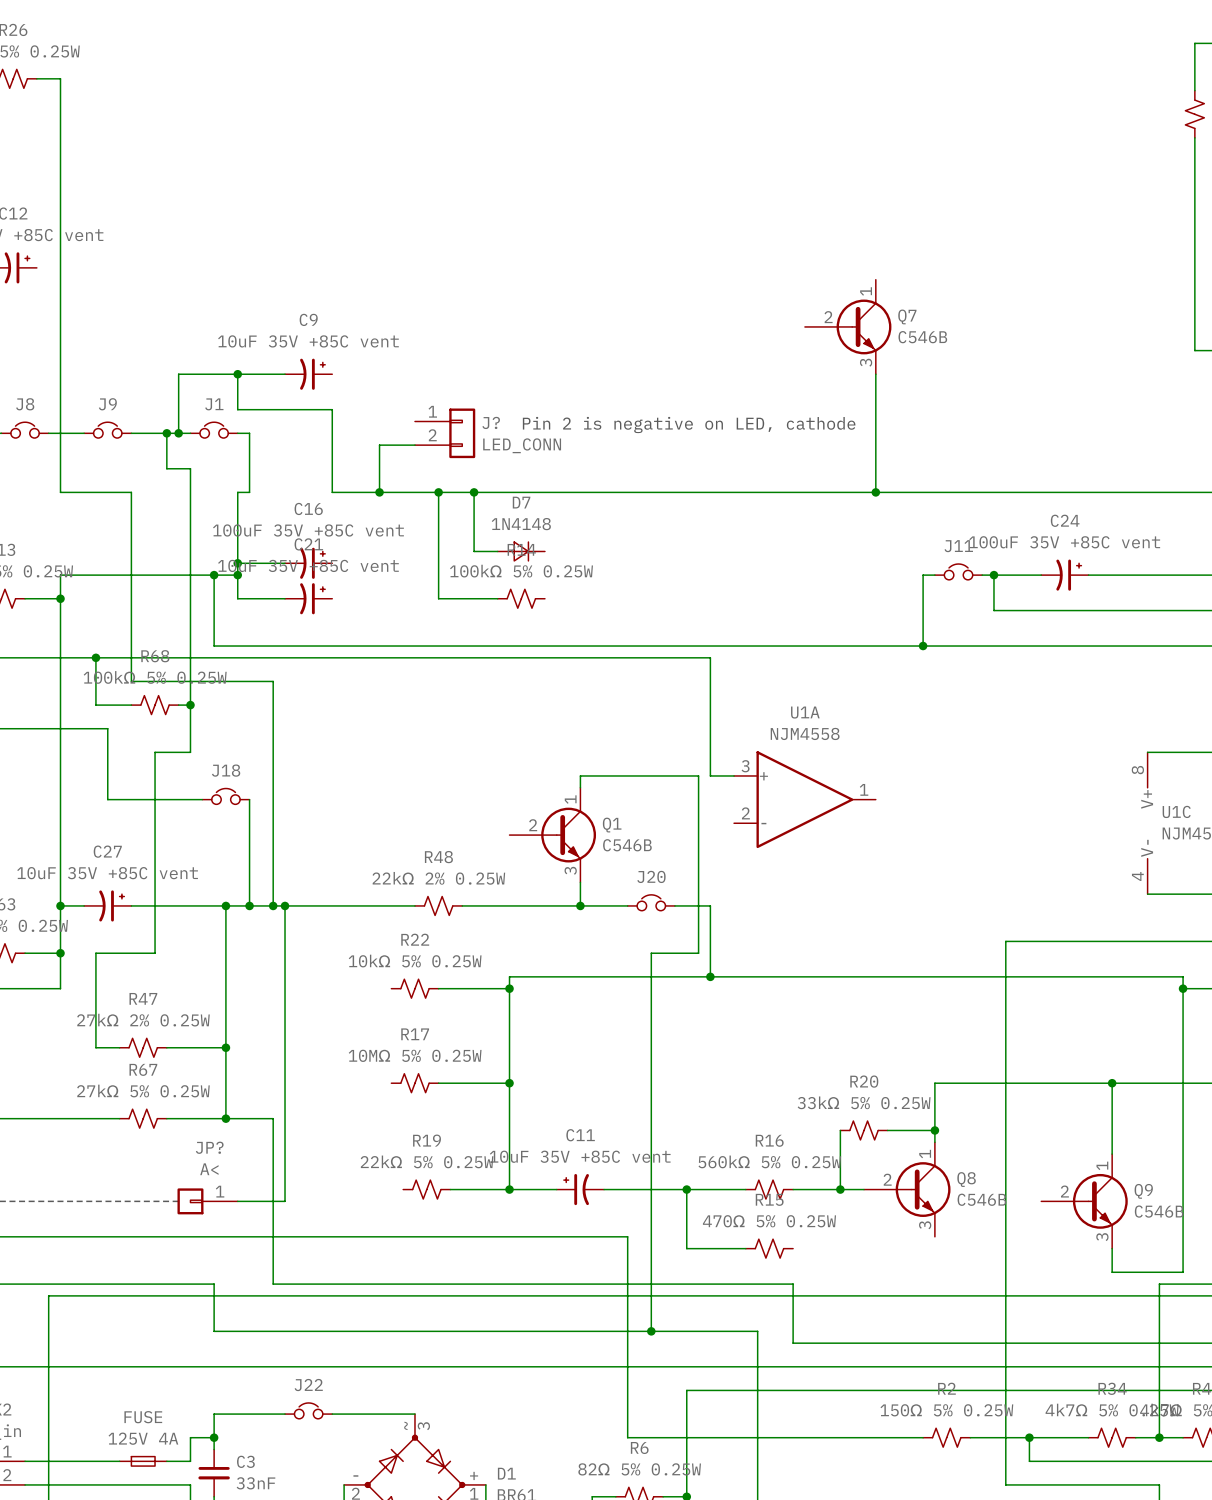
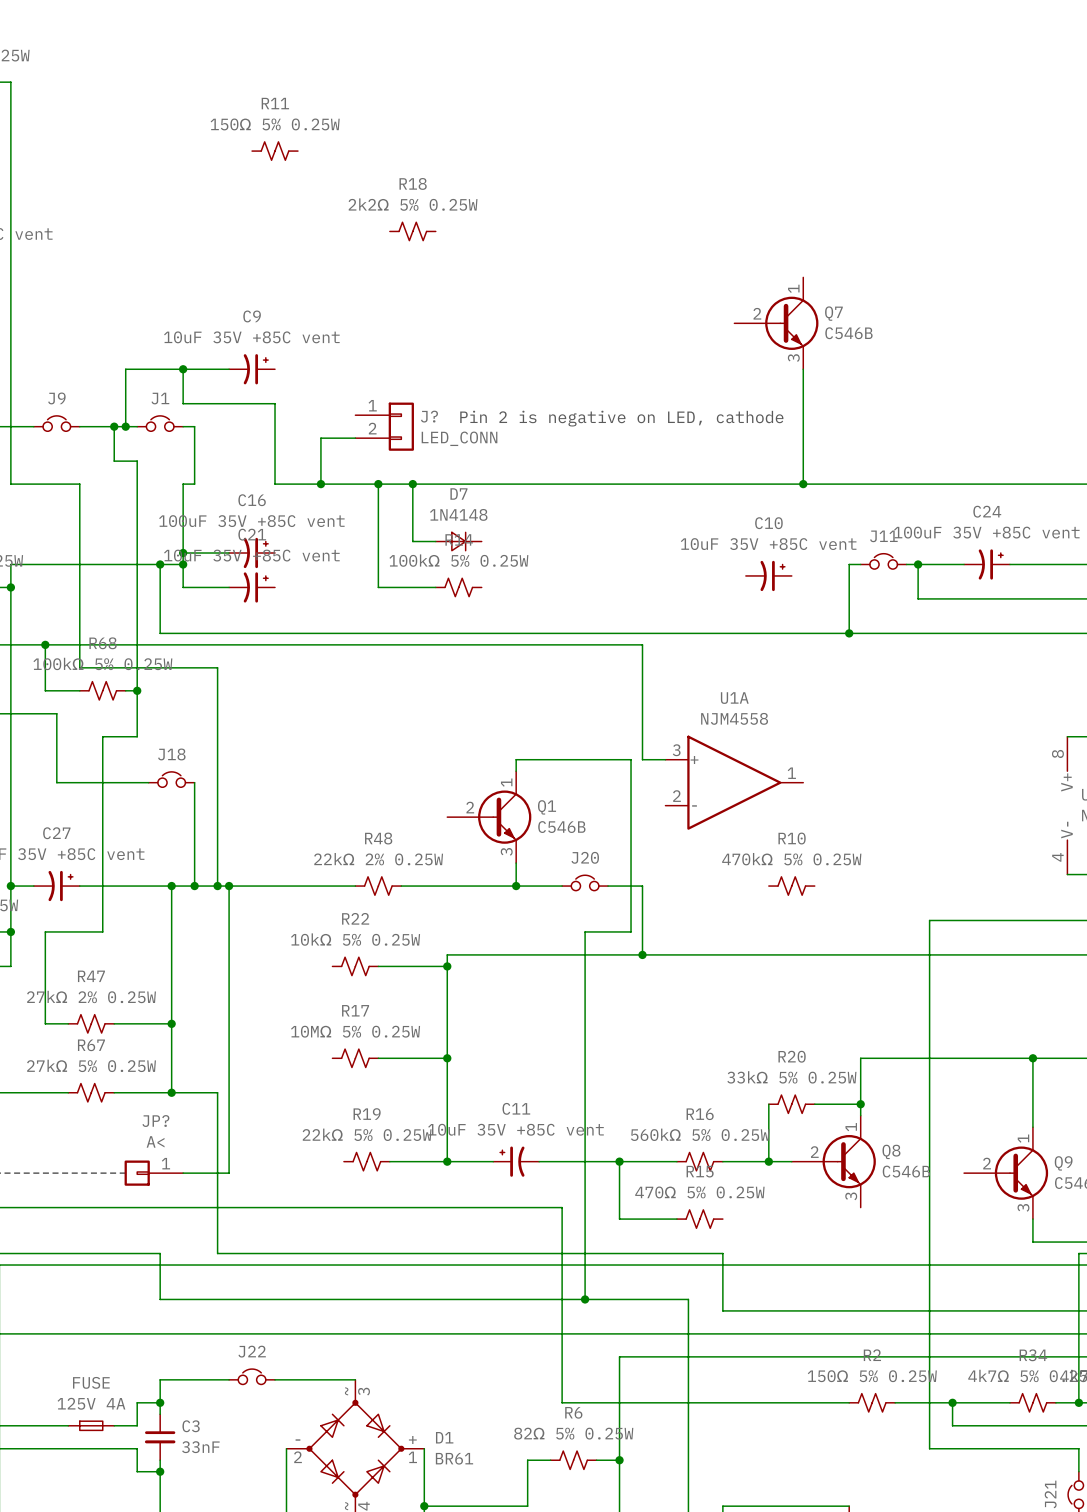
R11: none -> 150Ω 5% 0.25W (275, 151)
R18: none -> 2k2Ω 5% 0.25W (412, 231)
C10: none -> 10uF 35V +85C vent (768, 575)
R10: none -> 470kΩ 5% 0.25W (791, 886)

